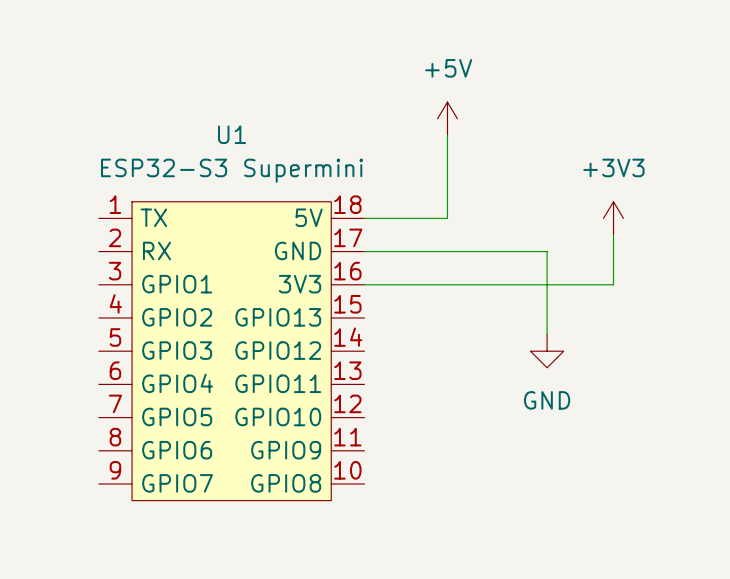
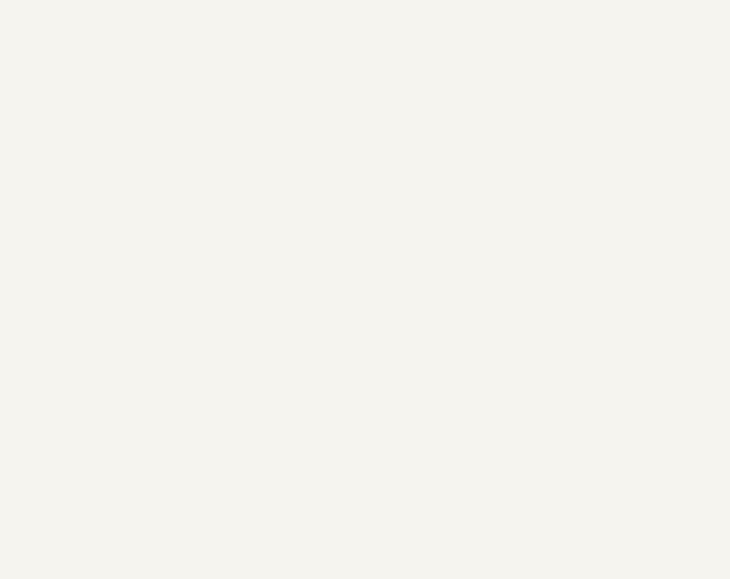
power symbol: +5V (447, 118) -> none
wire: (447, 135) (447, 218) (364, 218) -> none
power symbol: +3V3 (613, 218) -> none
wire: (613, 234) (613, 284) (364, 284) -> none
wire: (364, 251) (547, 251) (547, 334) -> none
U1: ESP32-S3 Supermini (231, 351) -> none
power symbol: GND (547, 351) -> none

